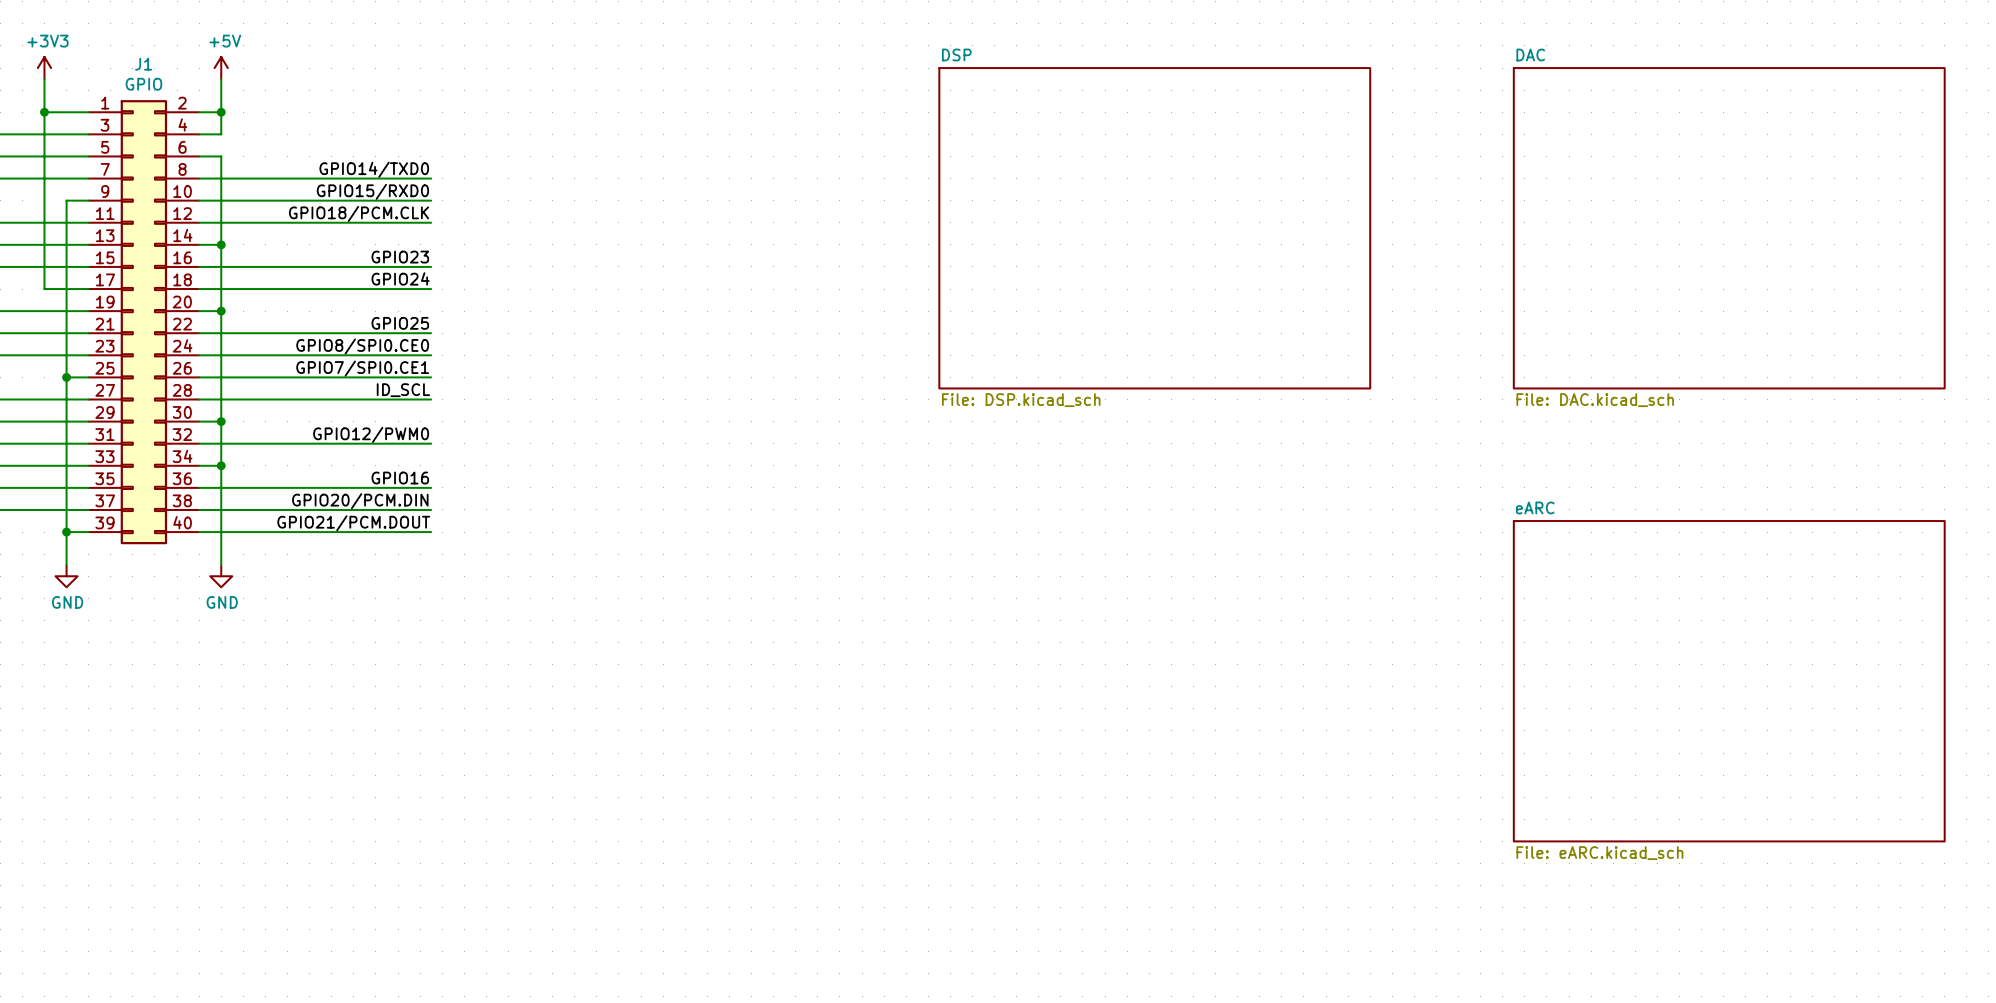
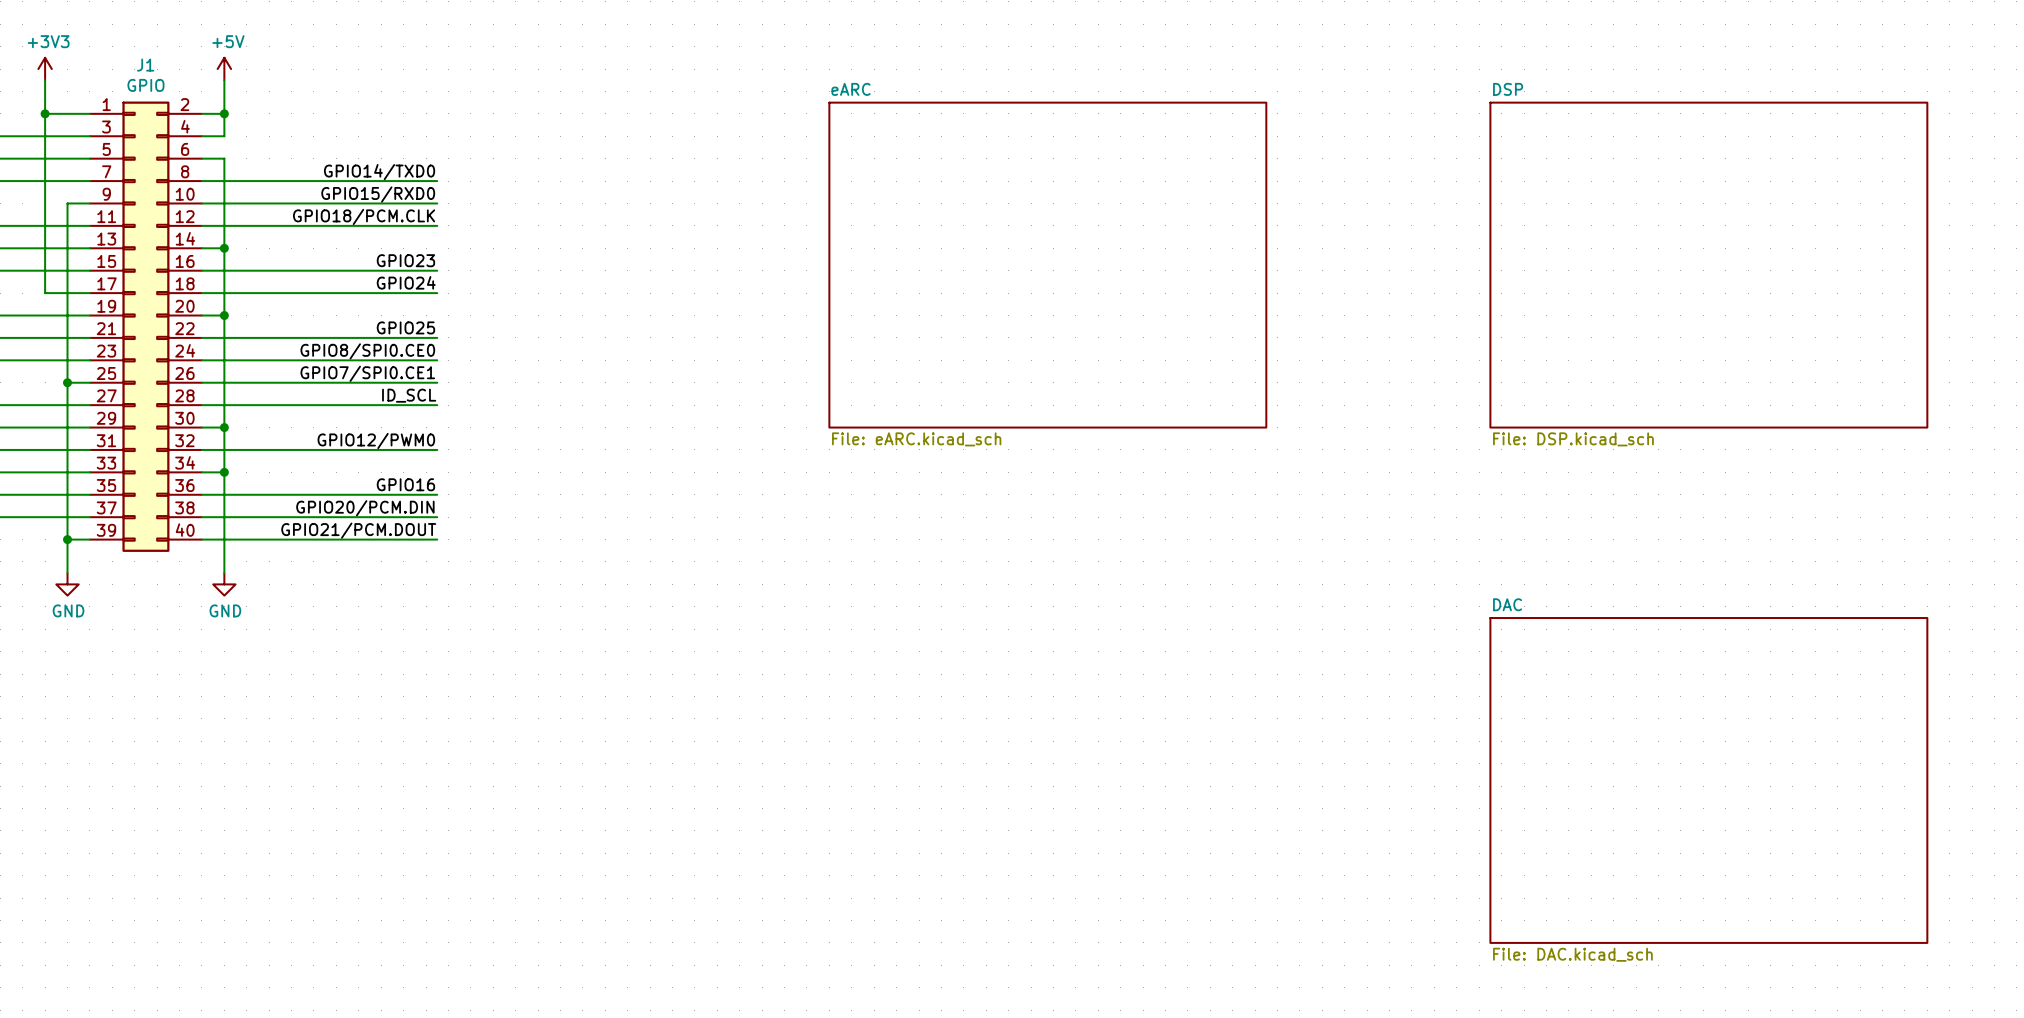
sheet DSP: File: DSP.kicad_sch (1154, 228) -> none
sheet DAC: File: DAC.kicad_sch (1729, 228) -> none
sheet eARC: none -> File: eARC.kicad_sch (1047, 265)
sheet DSP: none -> File: DSP.kicad_sch (1708, 265)
sheet eARC: File: eARC.kicad_sch (1729, 681) -> none
sheet DAC: none -> File: DAC.kicad_sch (1708, 780)

